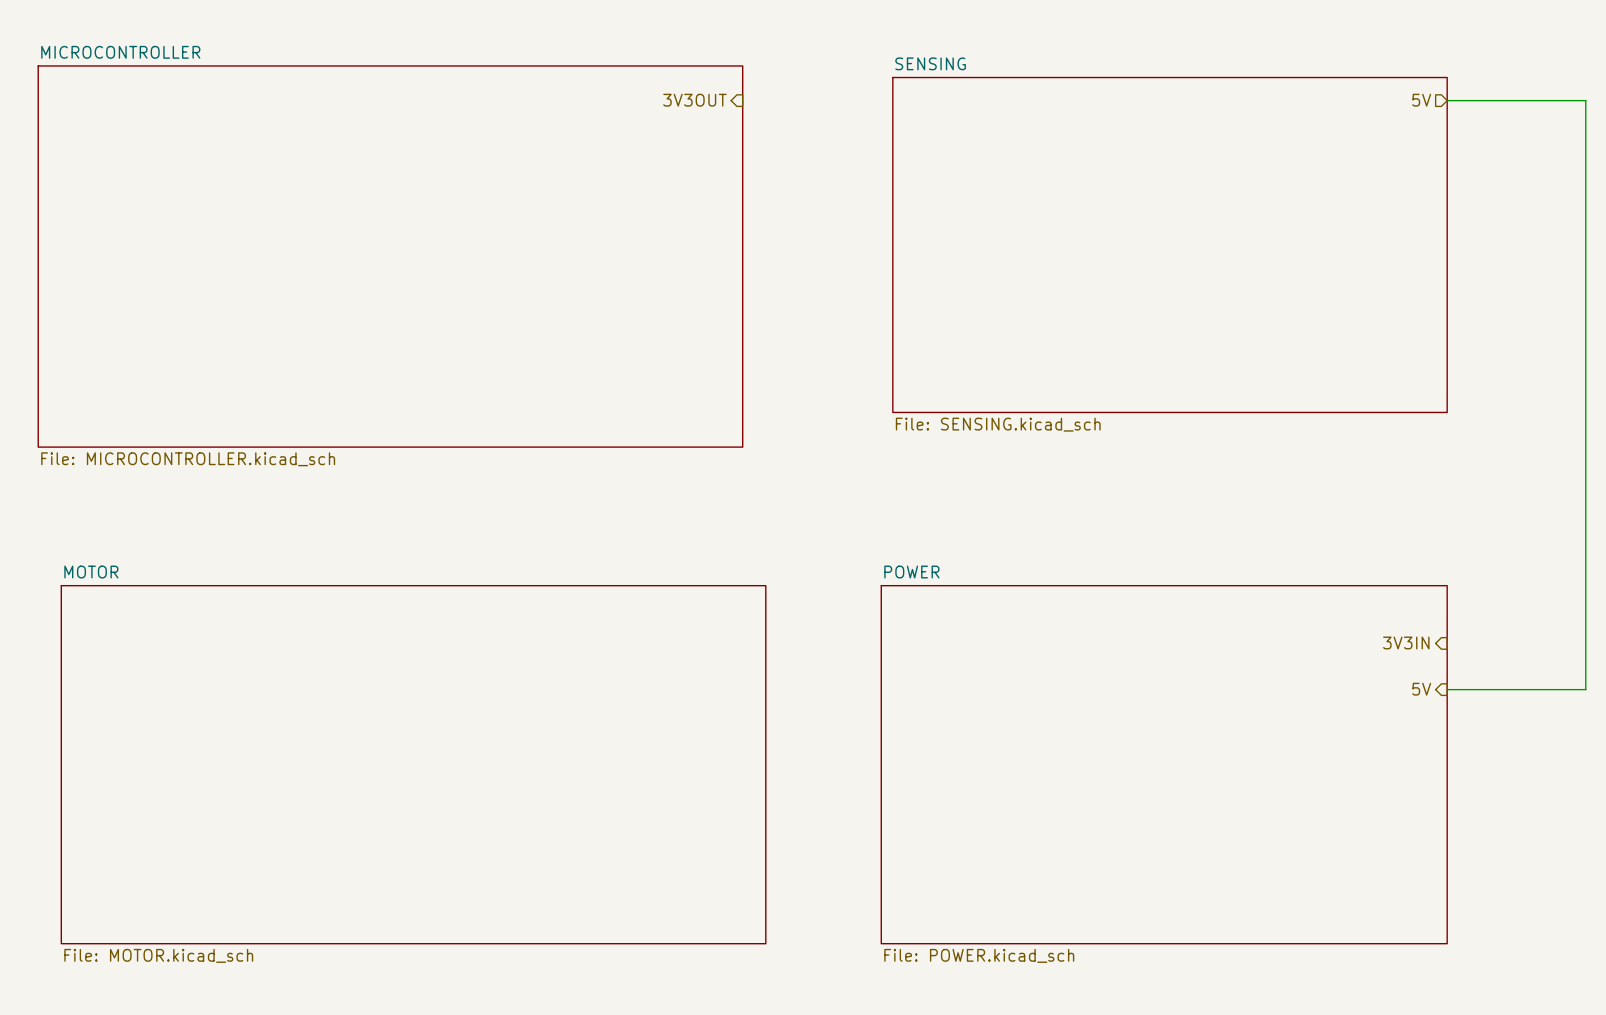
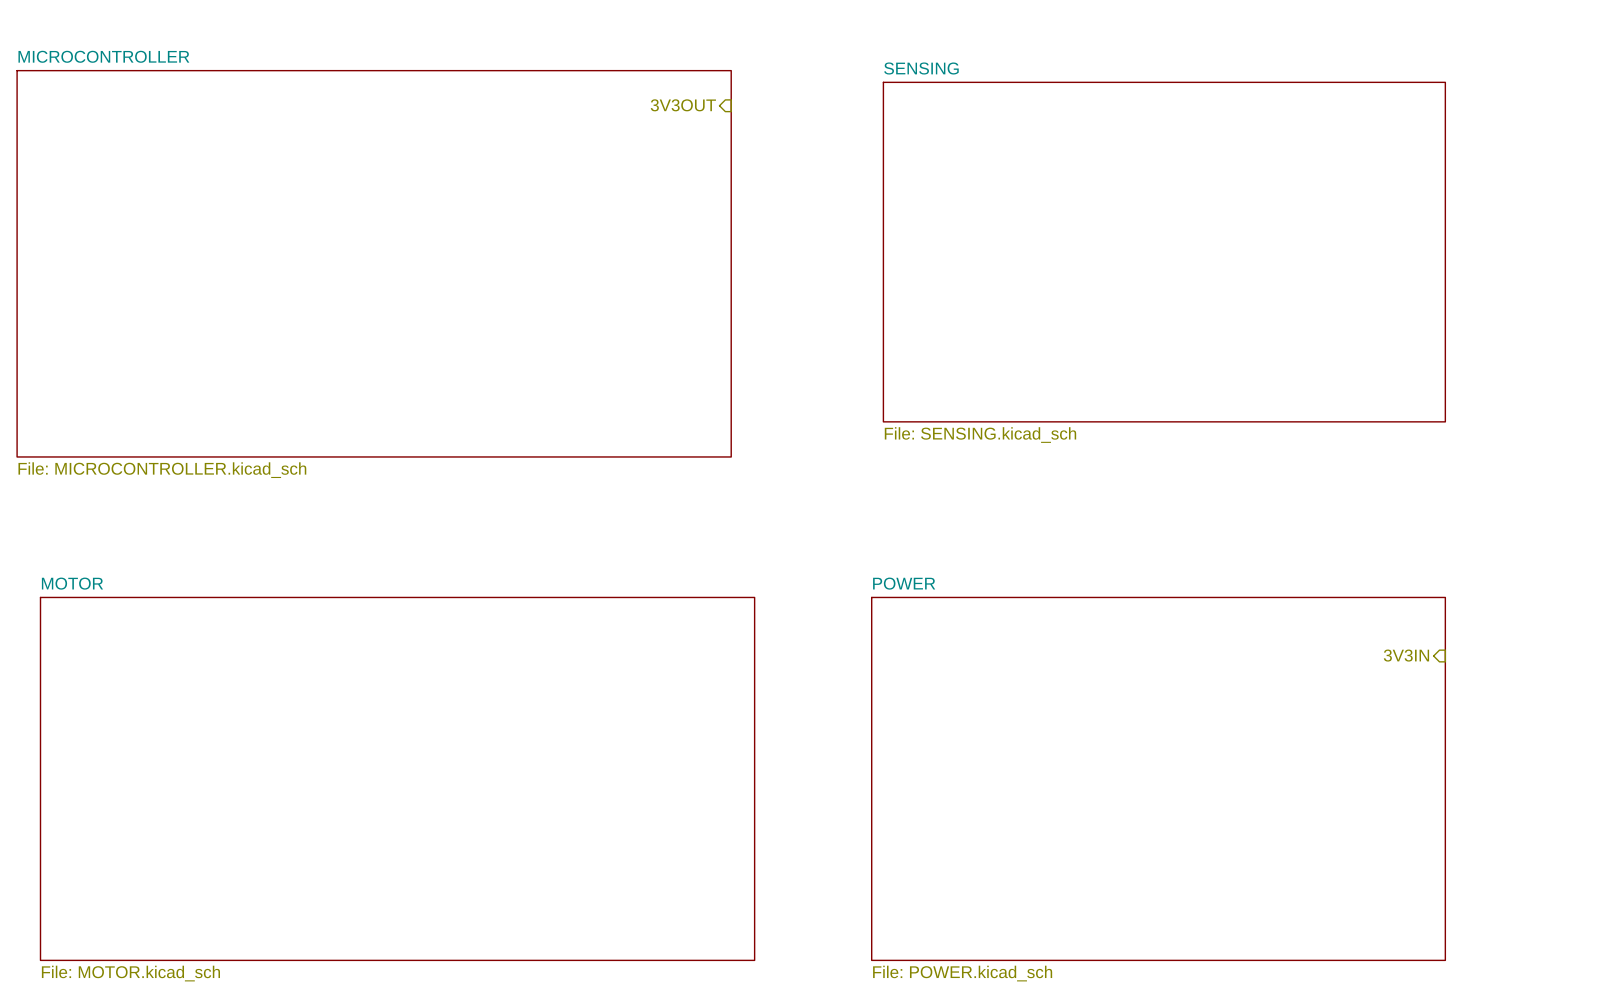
hierarchical label: 5V (1421, 100) -> none
wire: (1447, 100) (1585, 100) (1585, 689) (1447, 689) -> none
hierarchical label: 5V (1421, 689) -> none

